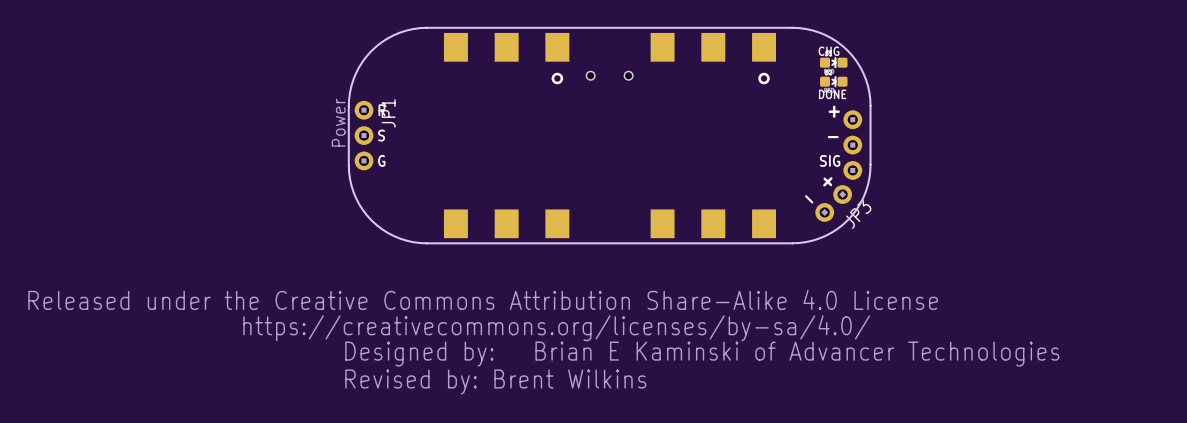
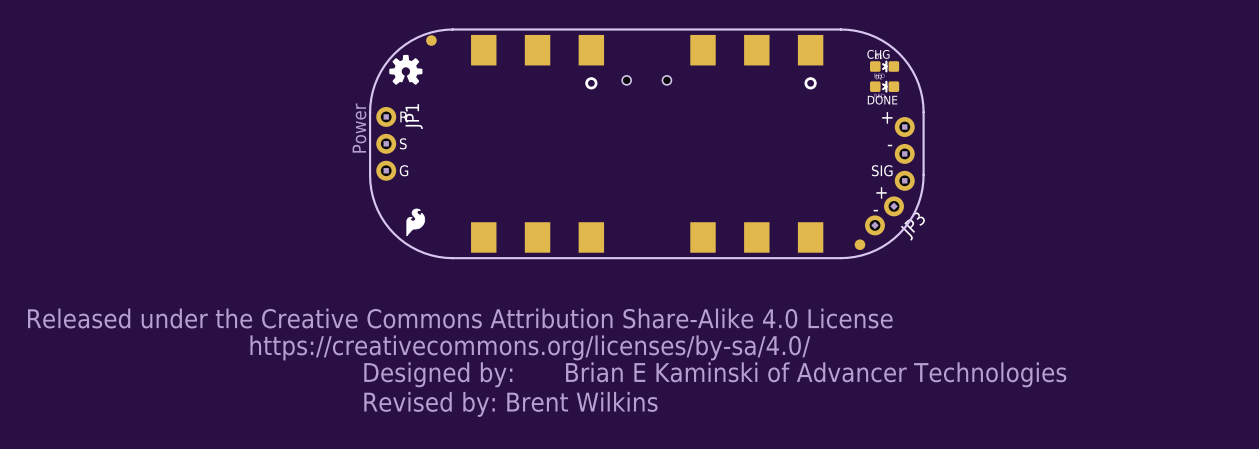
part: none -> (431, 40)
drawing: none -> [389, 54, 423, 85]
text rotation: 0° (827, 181) -> 45° counterclockwise (881, 192)
drawing: none -> [406, 208, 426, 237]
text rotation: 0° (809, 199) -> 45° counterclockwise (875, 210)
part: none -> (859, 244)

